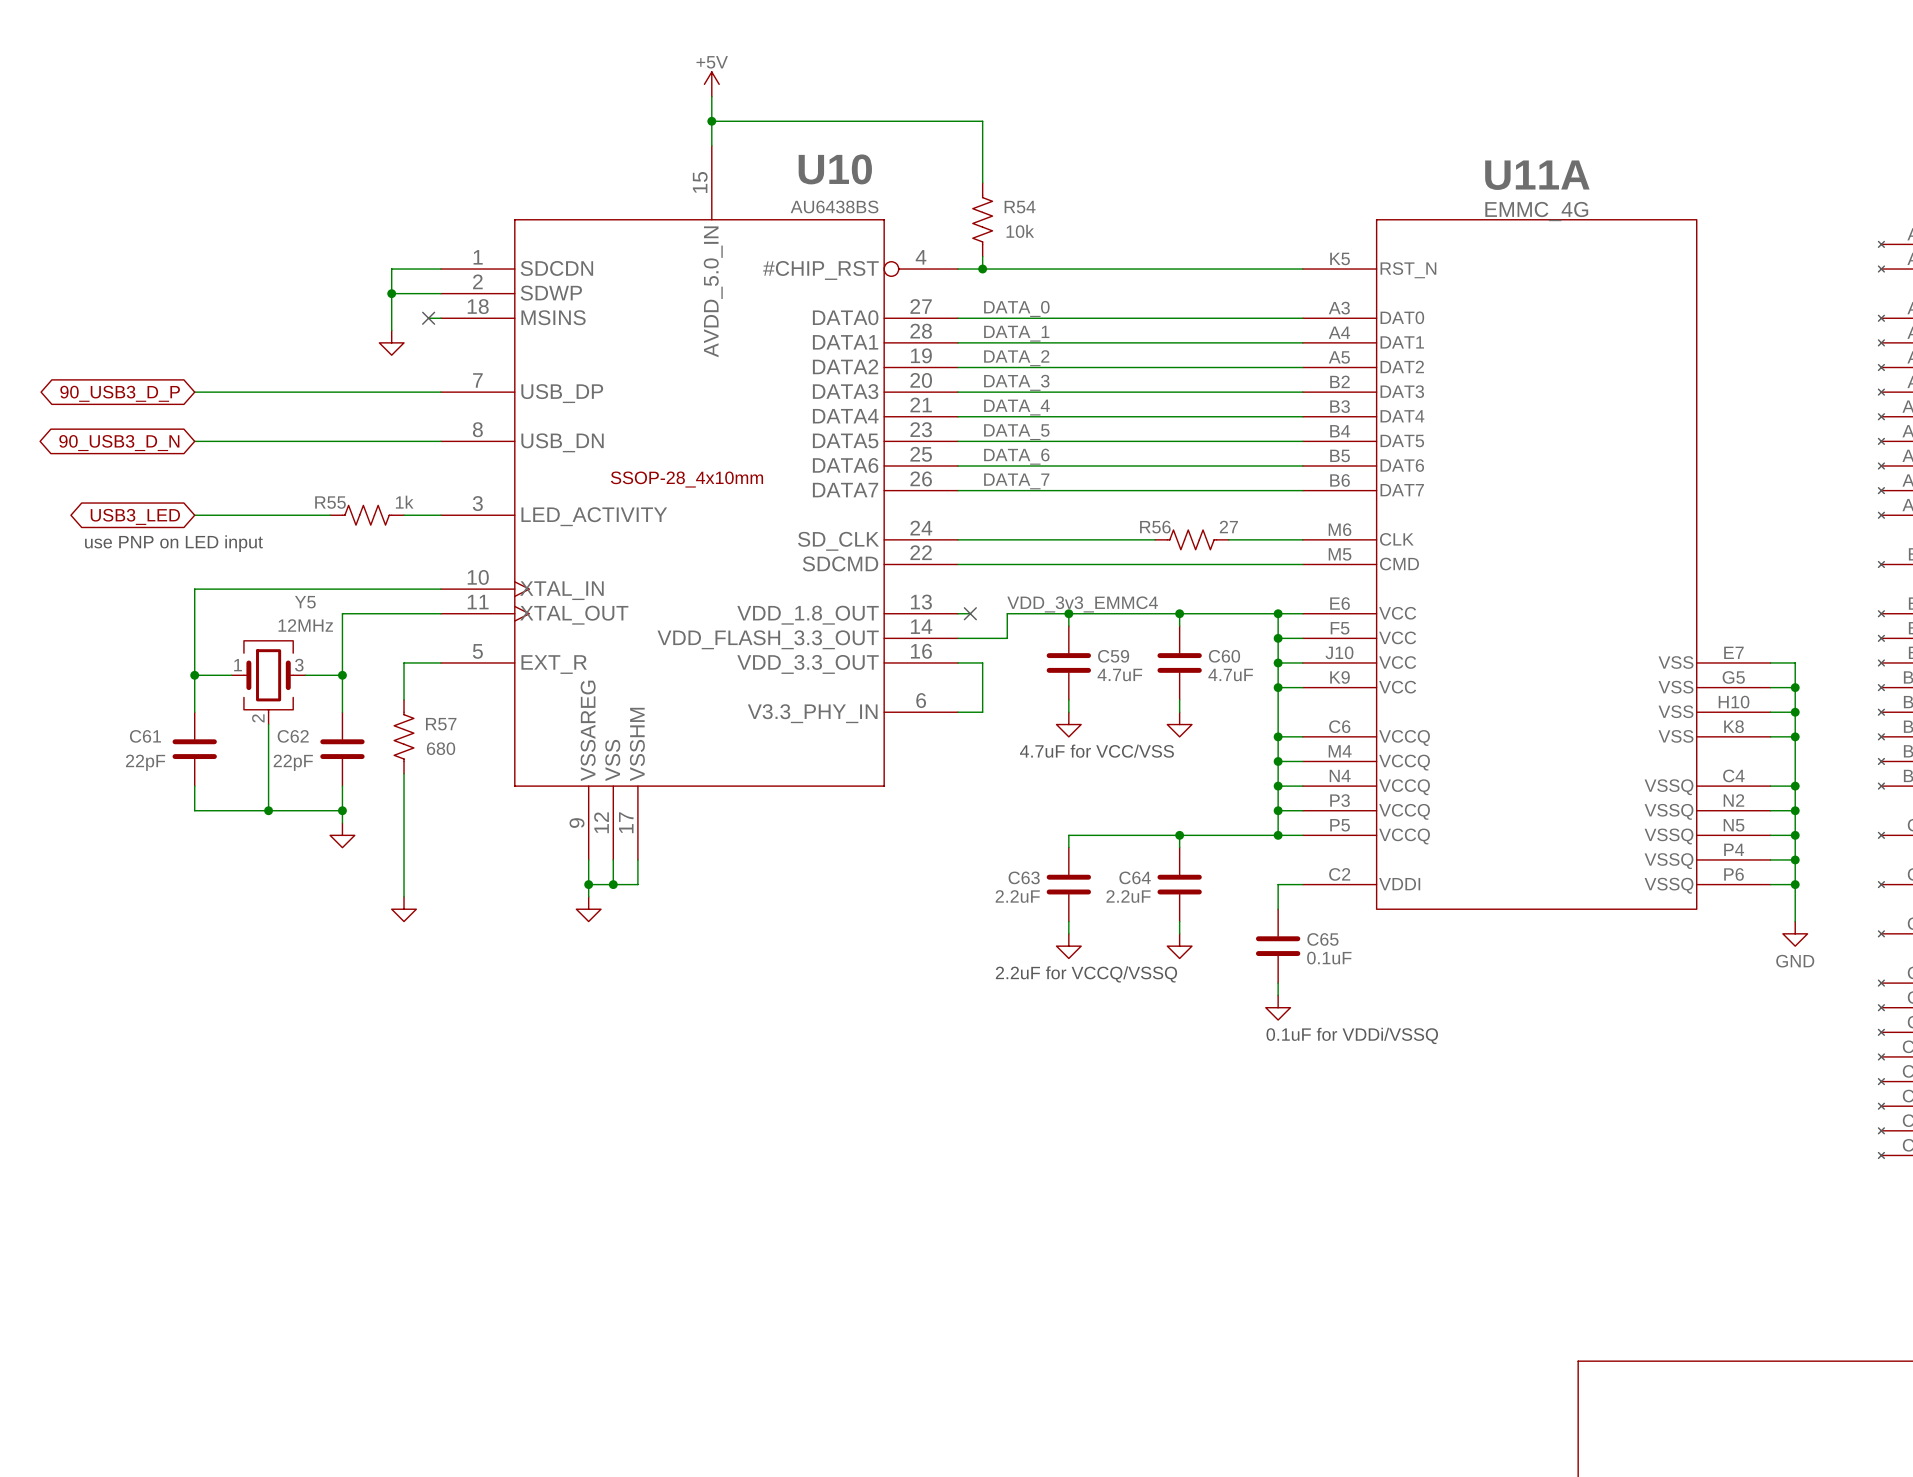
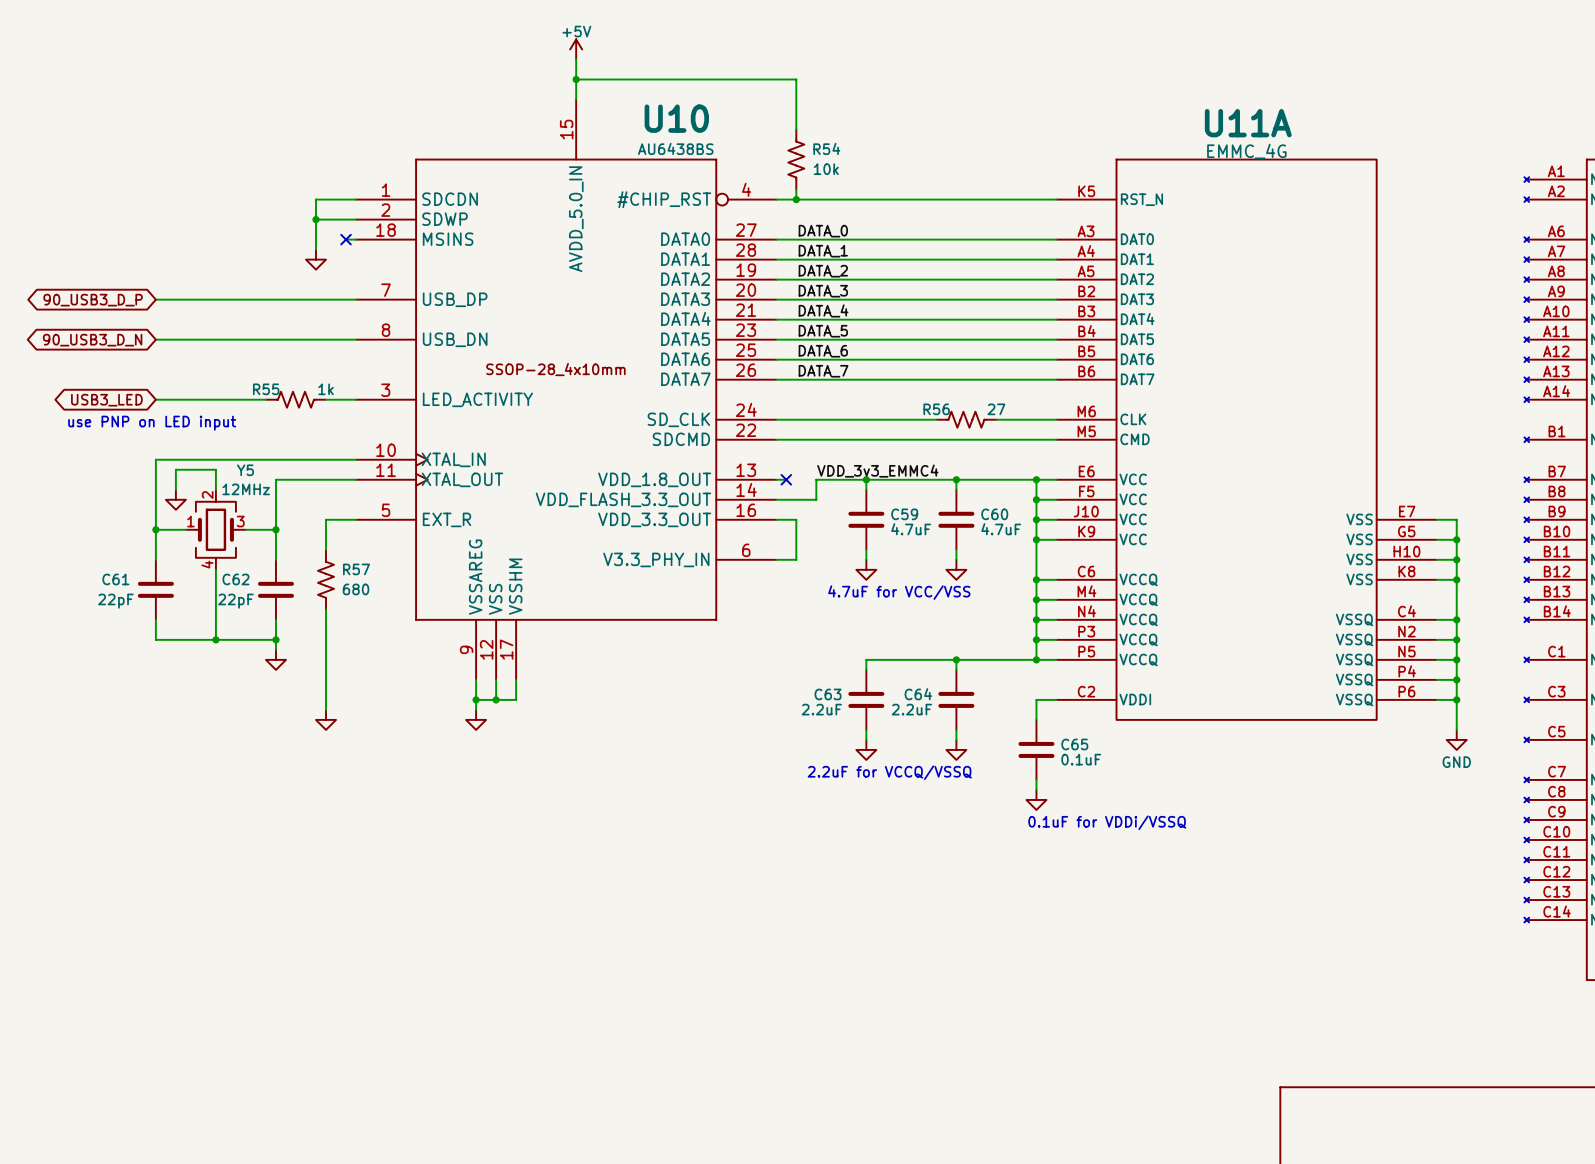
wire: none -> (175, 489) (175, 469) (215, 469) (215, 489)
power symbol: none -> (175, 499)
Y5 symbol: [231, 640, 306, 725] -> [185, 489, 246, 570]

